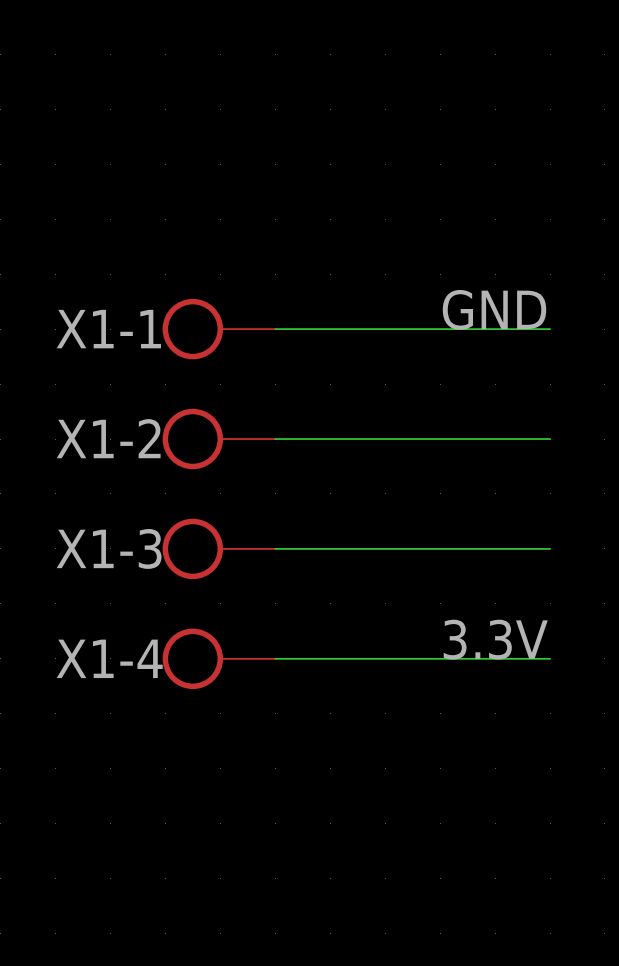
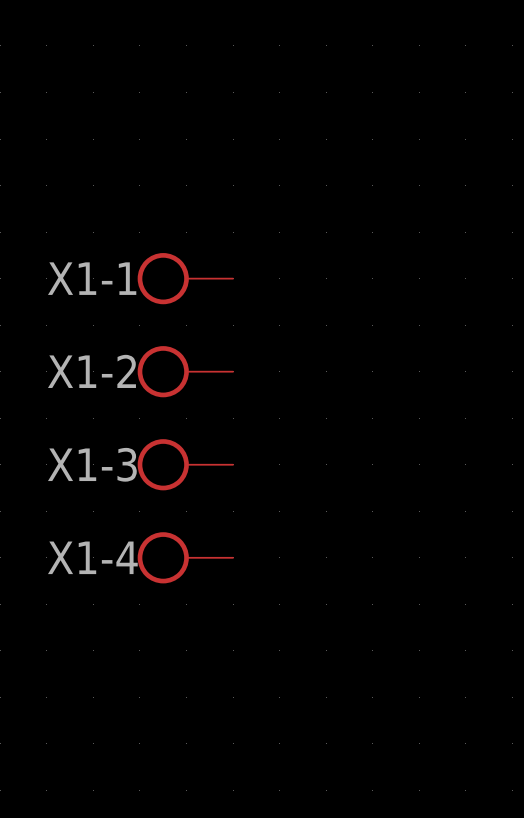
label: GND (494, 309) -> none
wire: (275, 329) (550, 329) -> none
wire: (275, 439) (550, 439) -> none
wire: (275, 548) (550, 548) -> none
label: 3.3V (495, 639) -> none
wire: (275, 658) (550, 658) -> none

